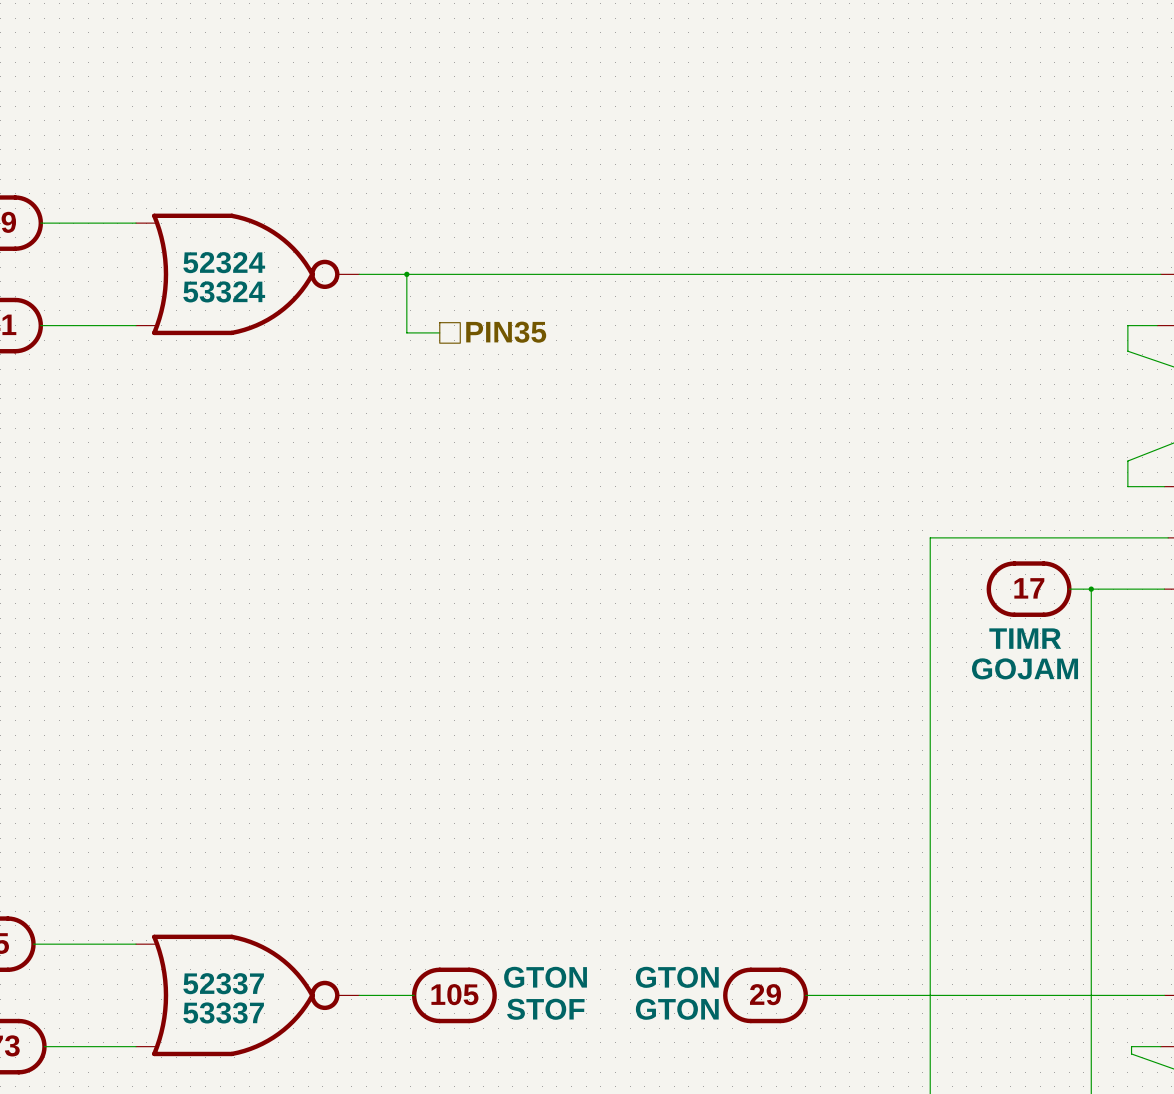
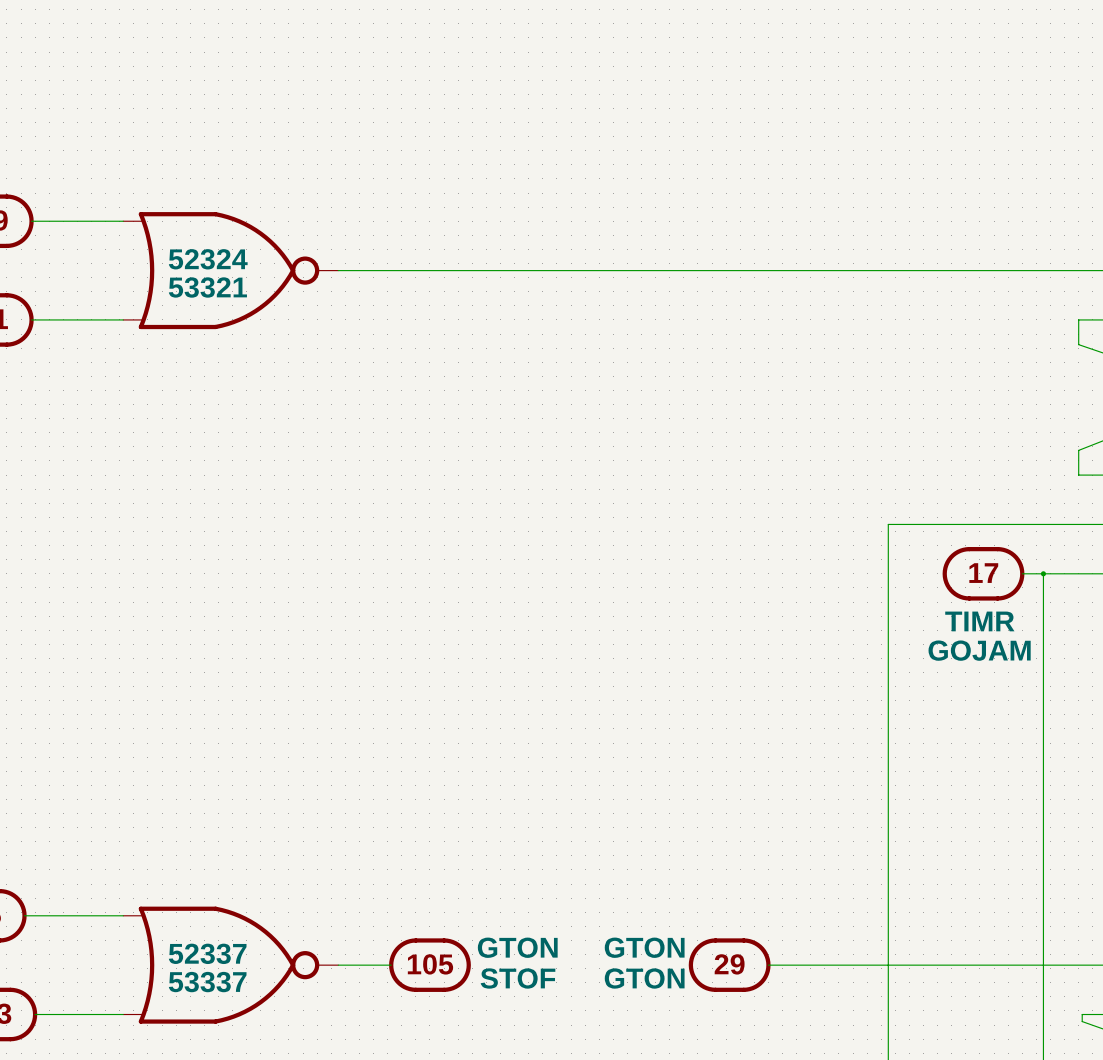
wire: (406, 274) (406, 332) (439, 332) -> none
junction: (406, 274) -> none
part text: 53324 (224, 291) -> 53321 (207, 287)
hierarchical label: PIN35 (506, 332) -> none

